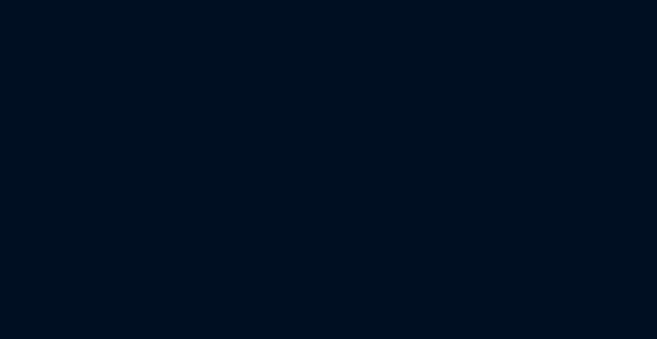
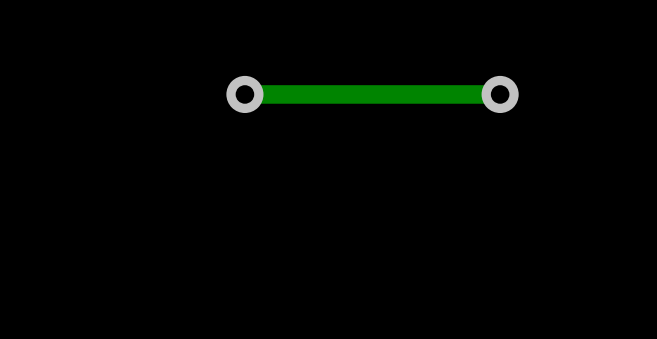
via: none -> (244, 94)
track: none -> (500, 94) (244, 94)
via: none -> (500, 94)

